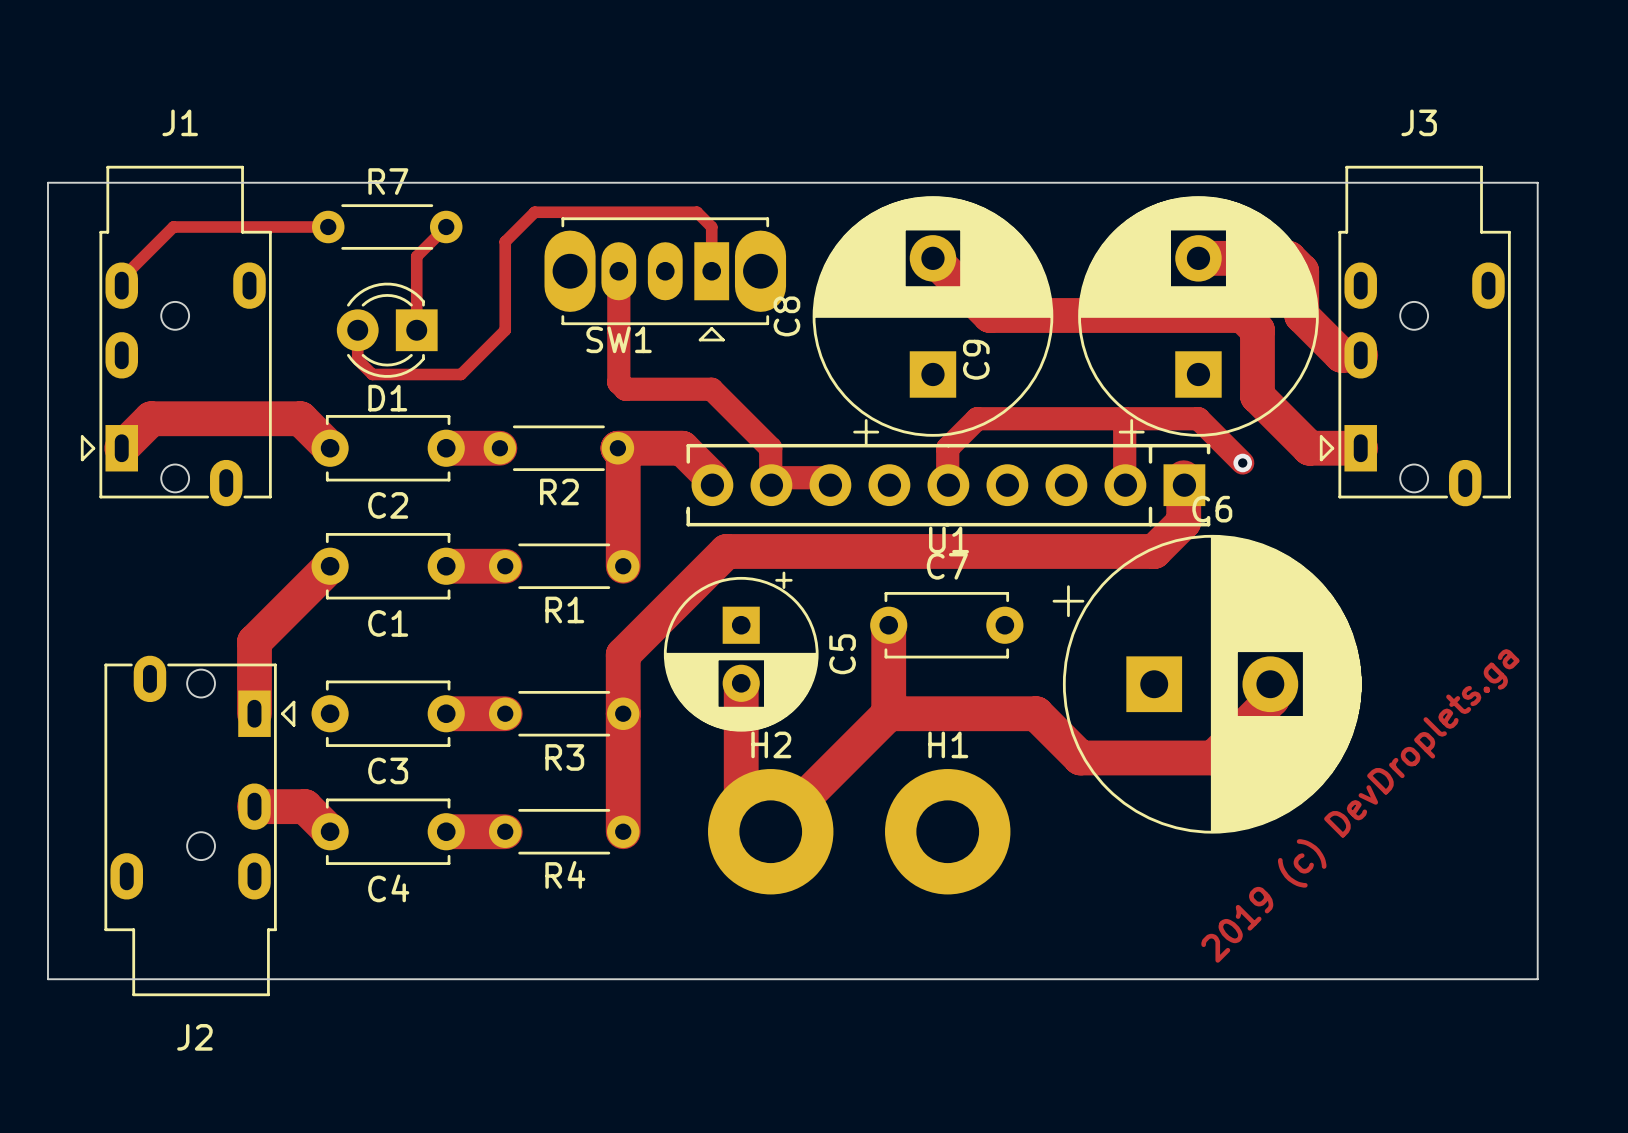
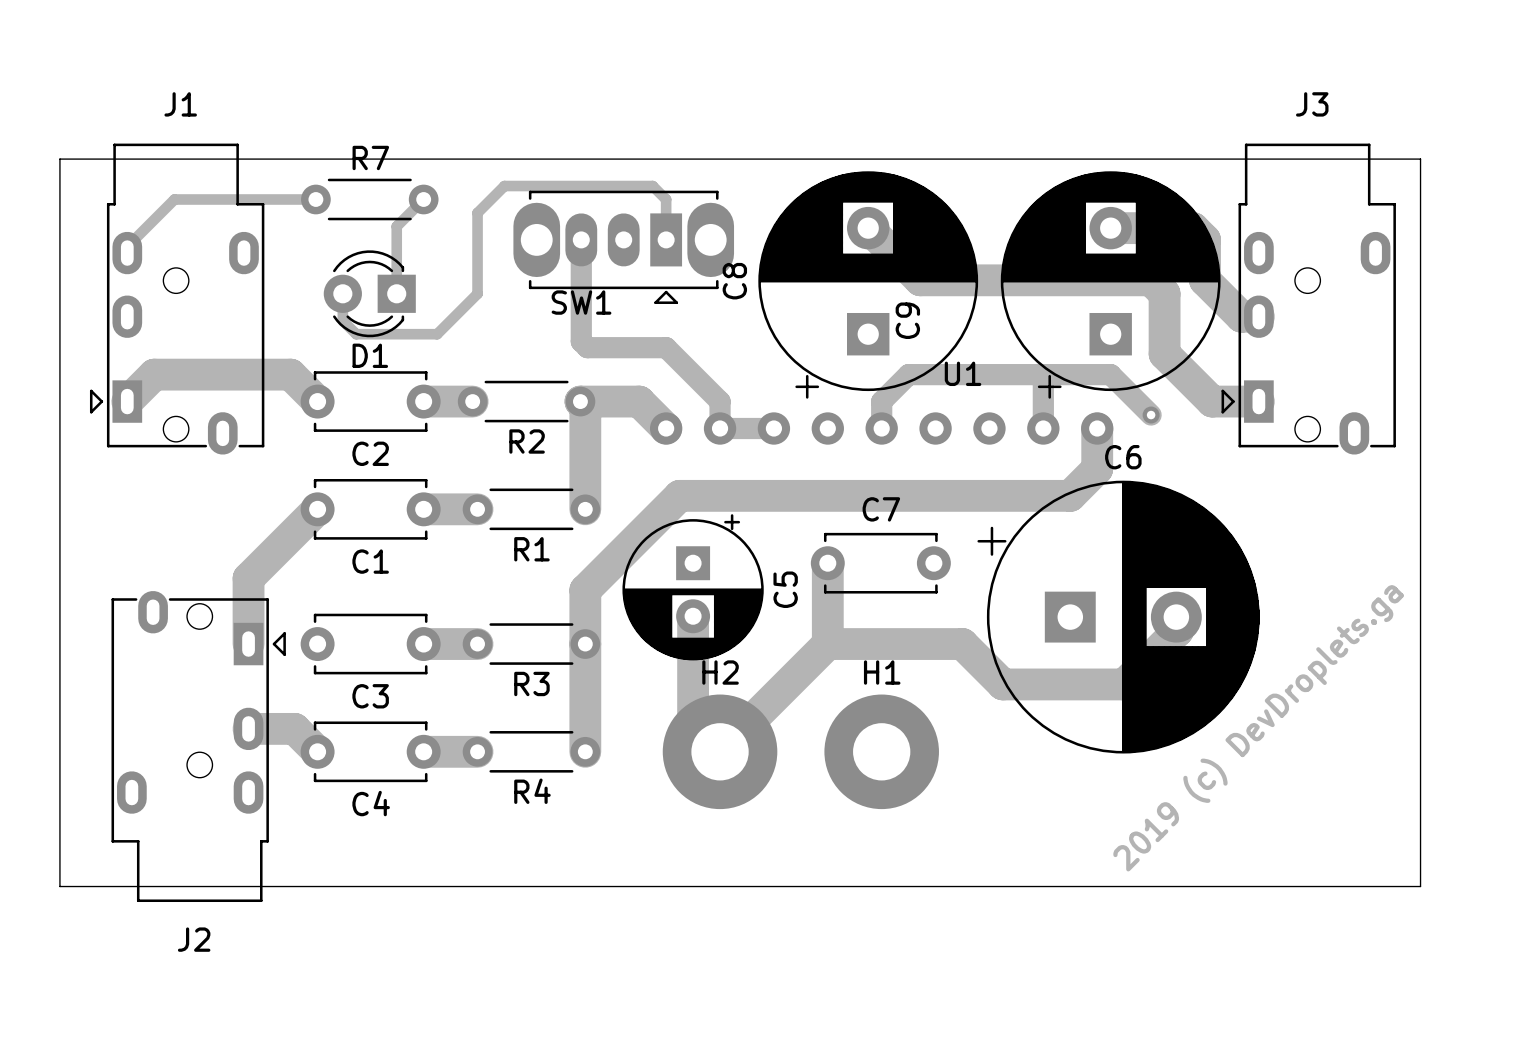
U1 footprint: [686, 443, 1211, 527] -> [649, 412, 1114, 445]
U1 name position: U1 (948, 540) -> U1 (963, 373)

